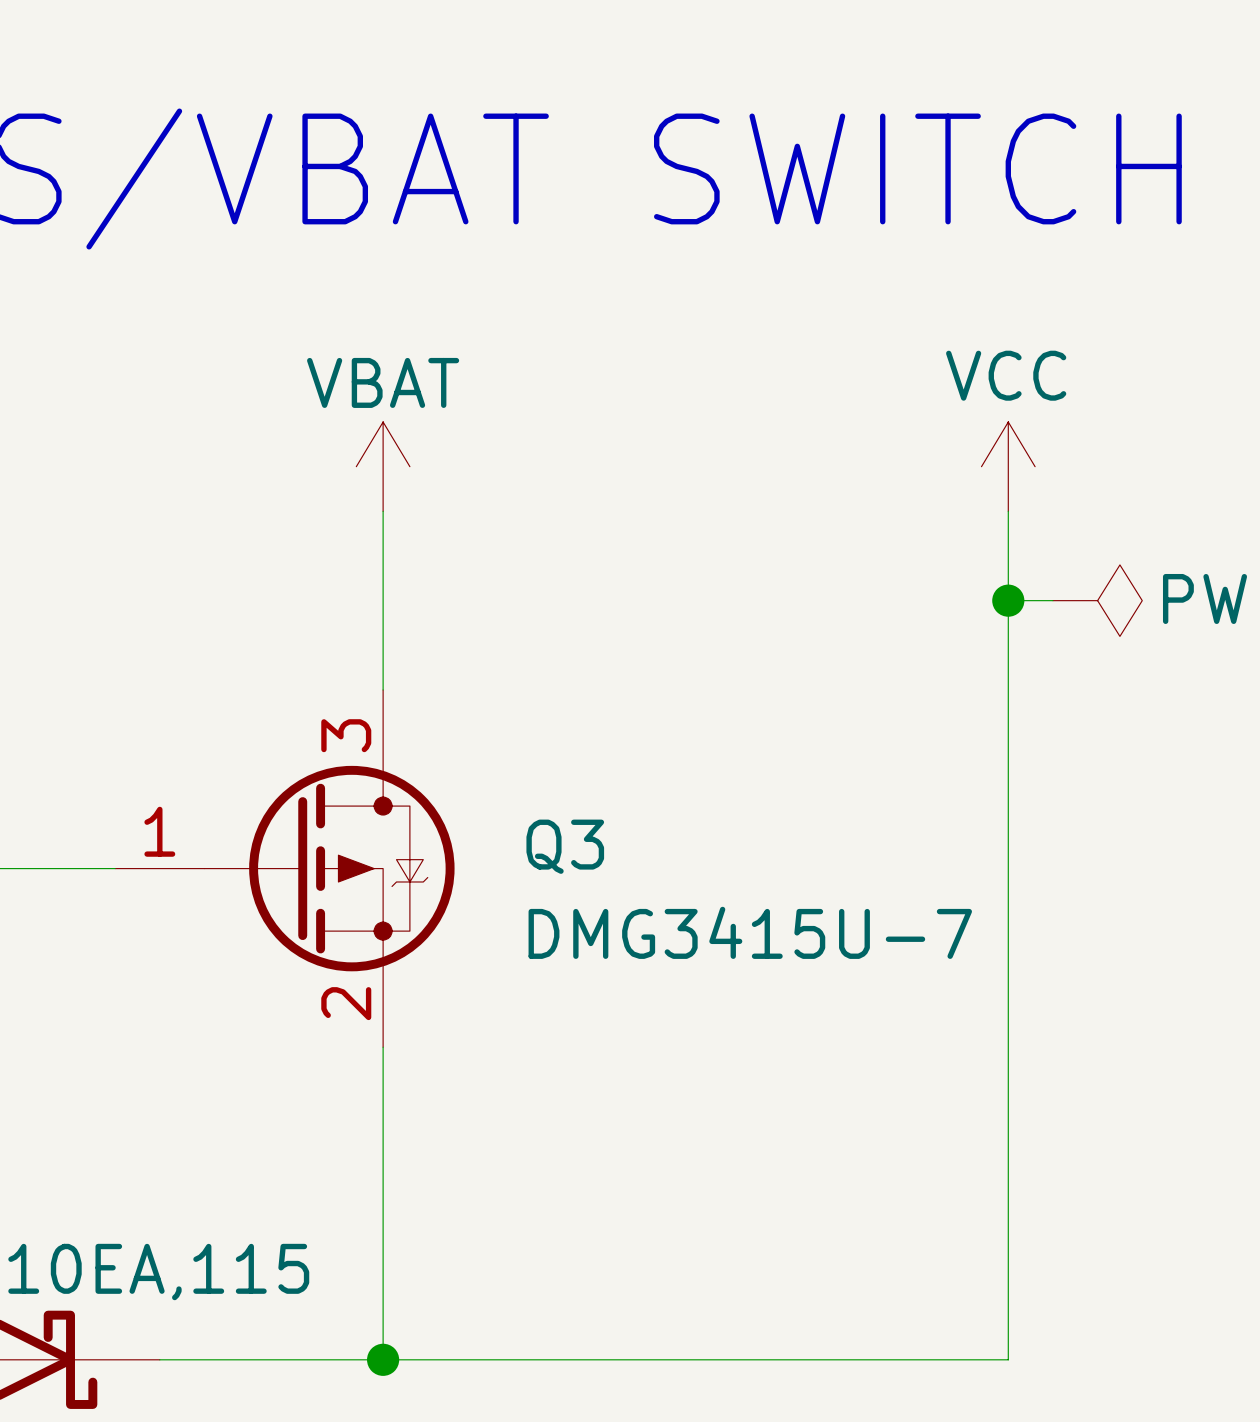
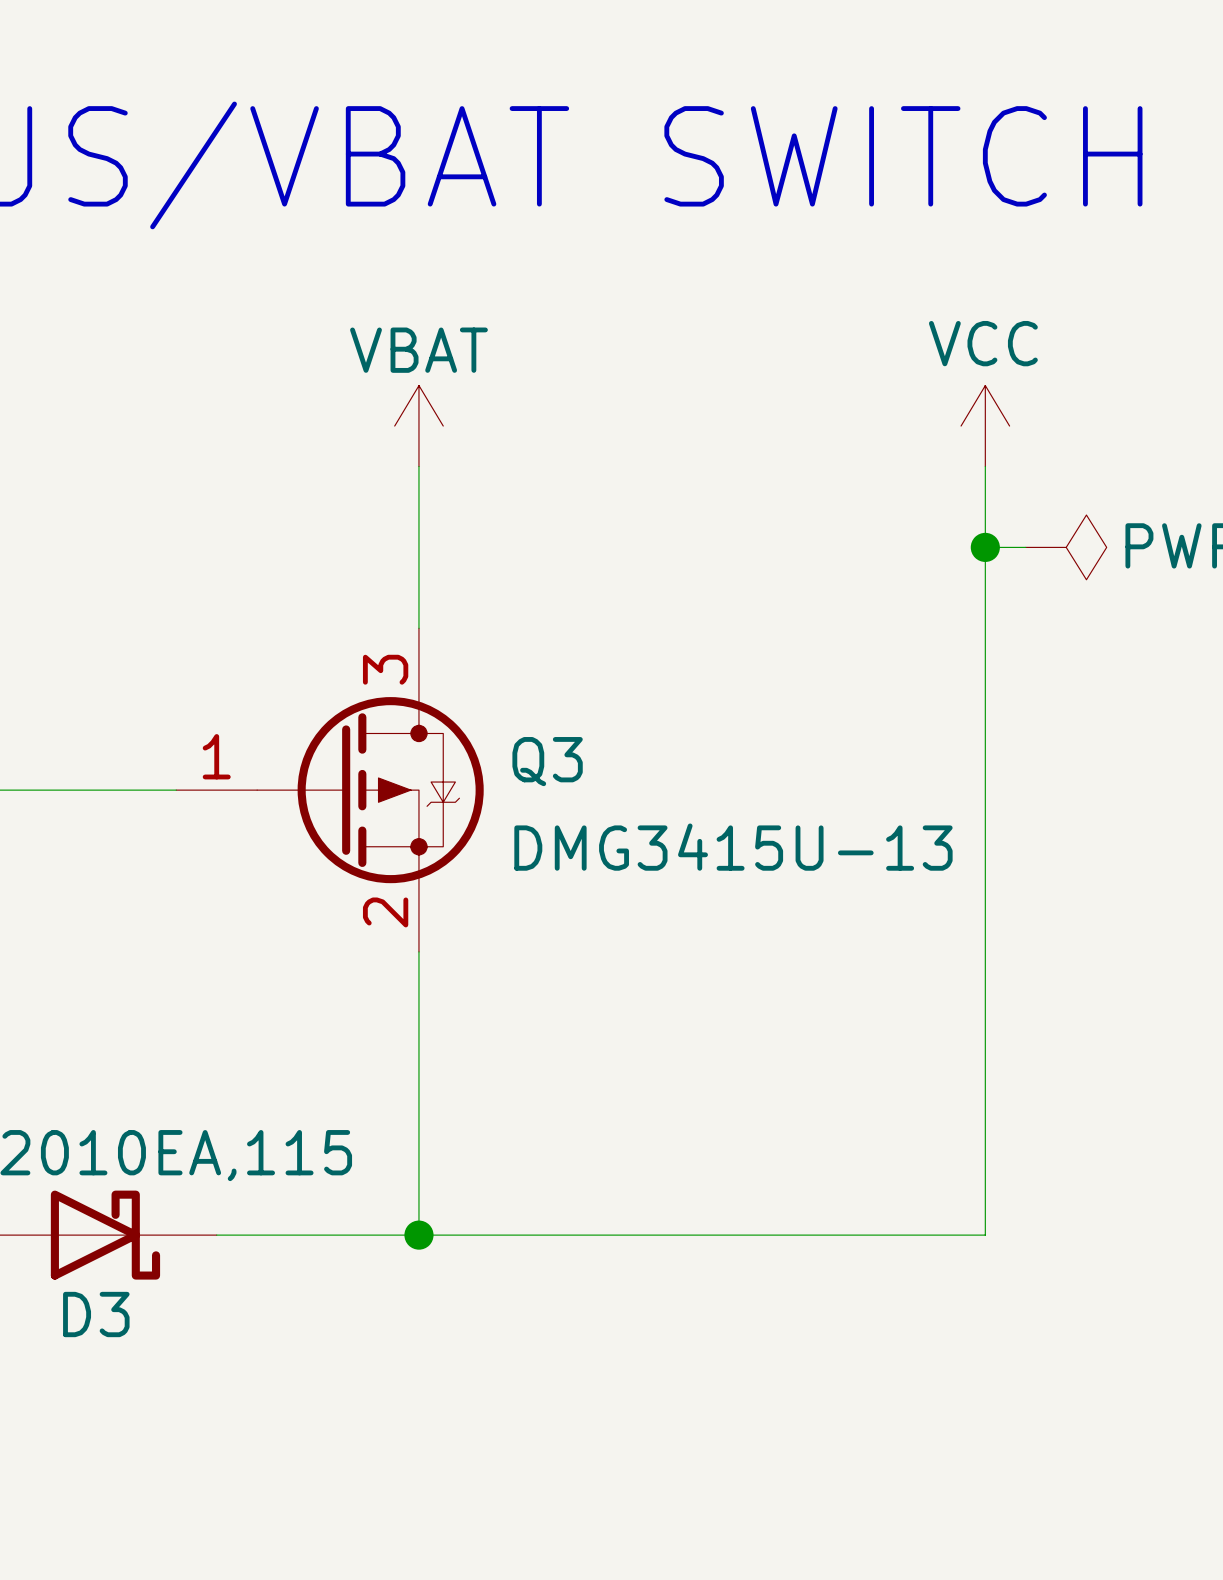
Q3 name position: Q3 (565, 846) -> Q3 (547, 761)
Q3 value: DMG3415U-7 (750, 932) -> DMG3415U-13 (733, 847)

